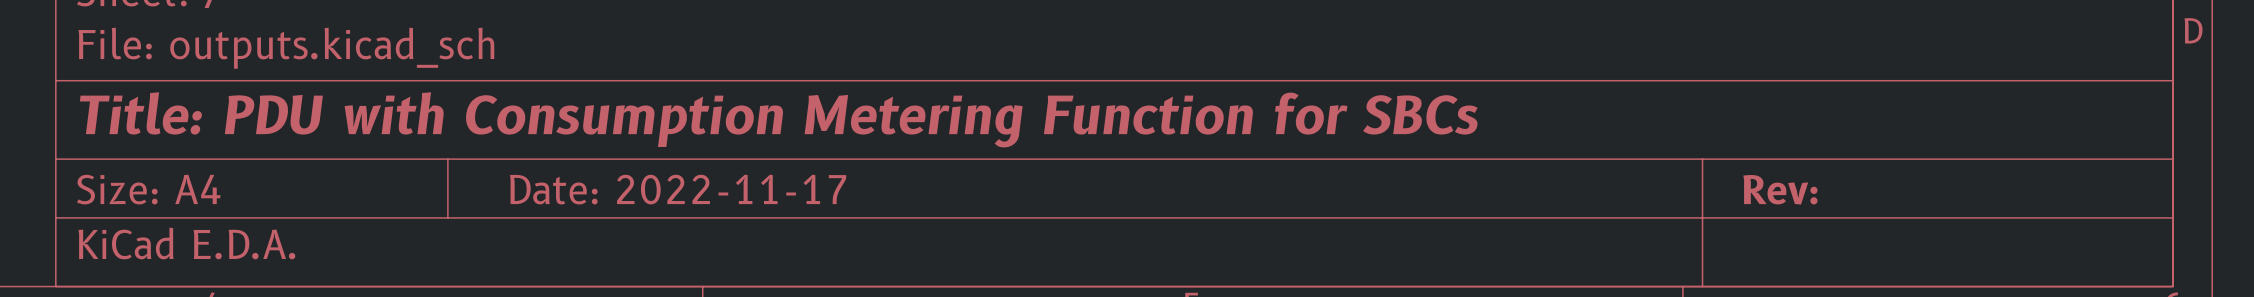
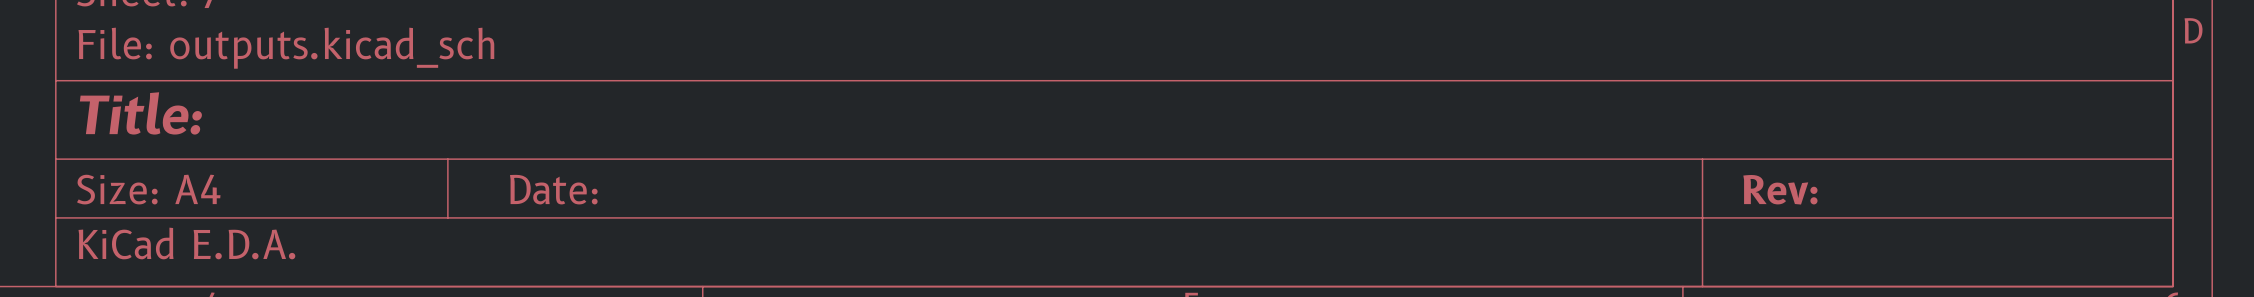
title block: Title: PDU with Consumption Metering Function for SBCs (778, 119) -> Title: (140, 113)
title block: Date: 2022-11-17 (678, 189) -> Date: (553, 189)

